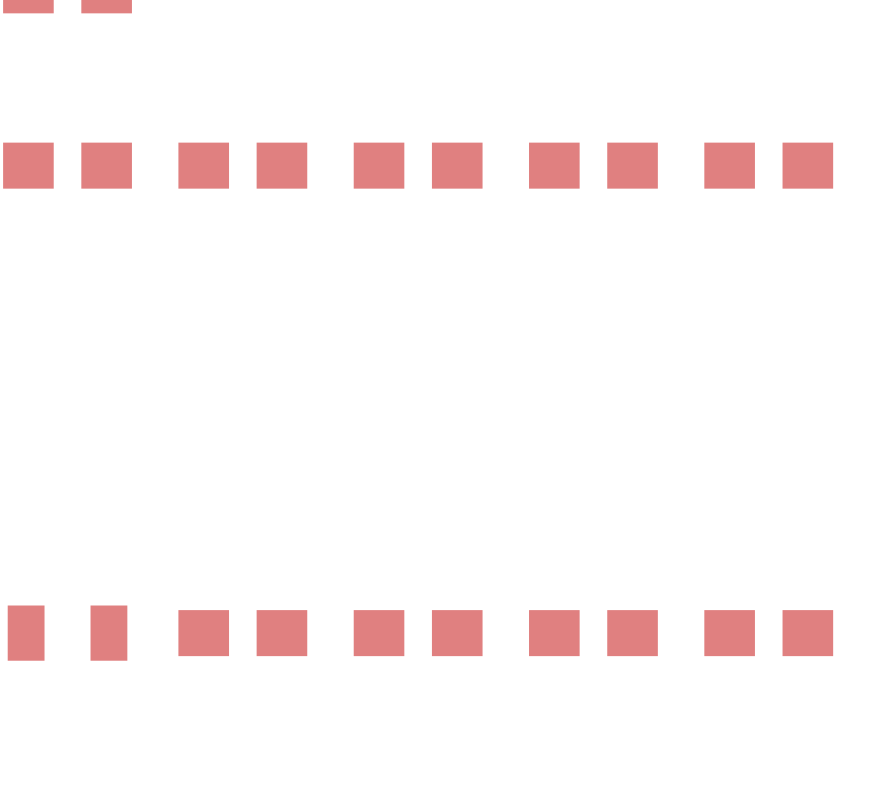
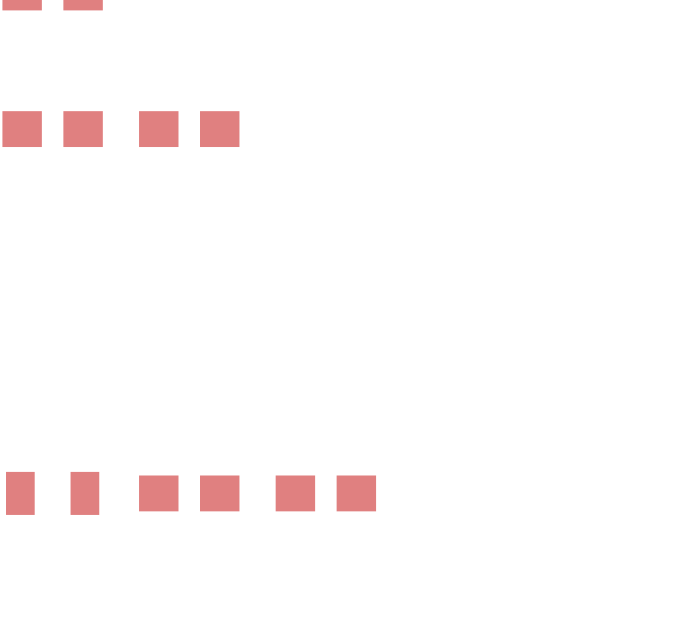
part: (418, 165) -> none
part: (593, 165) -> none
part: (768, 165) -> none
part: (593, 633) -> none
part: (768, 633) -> none

